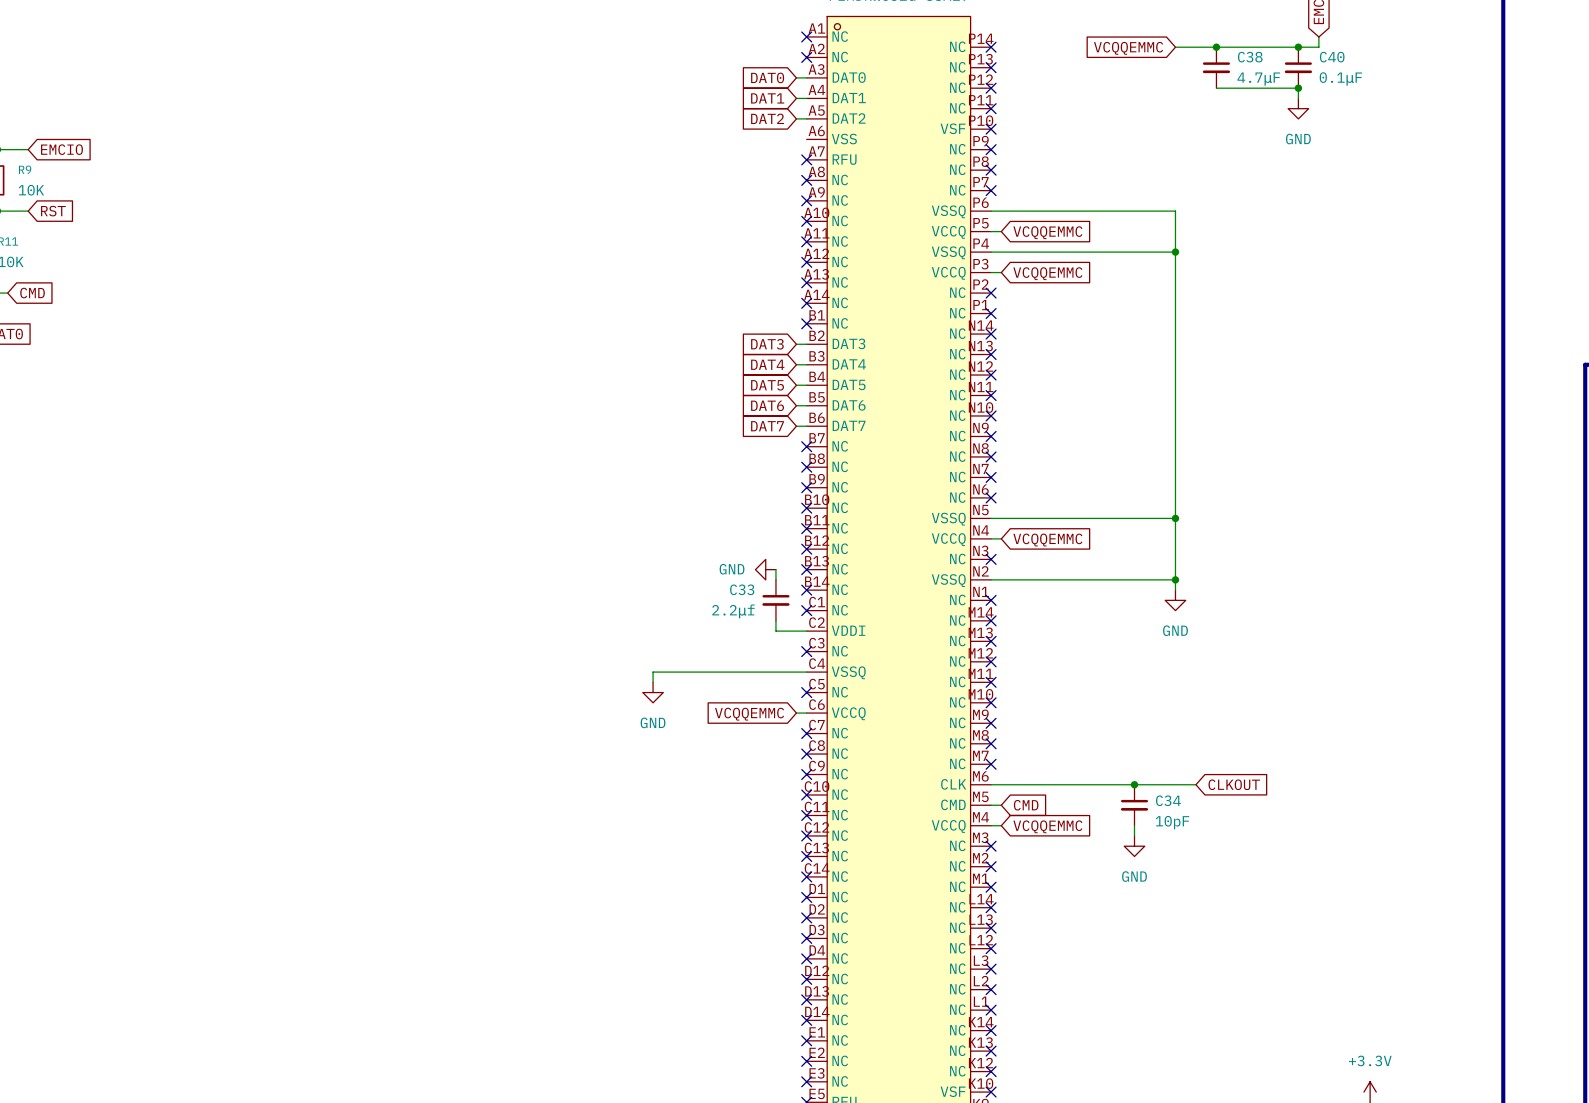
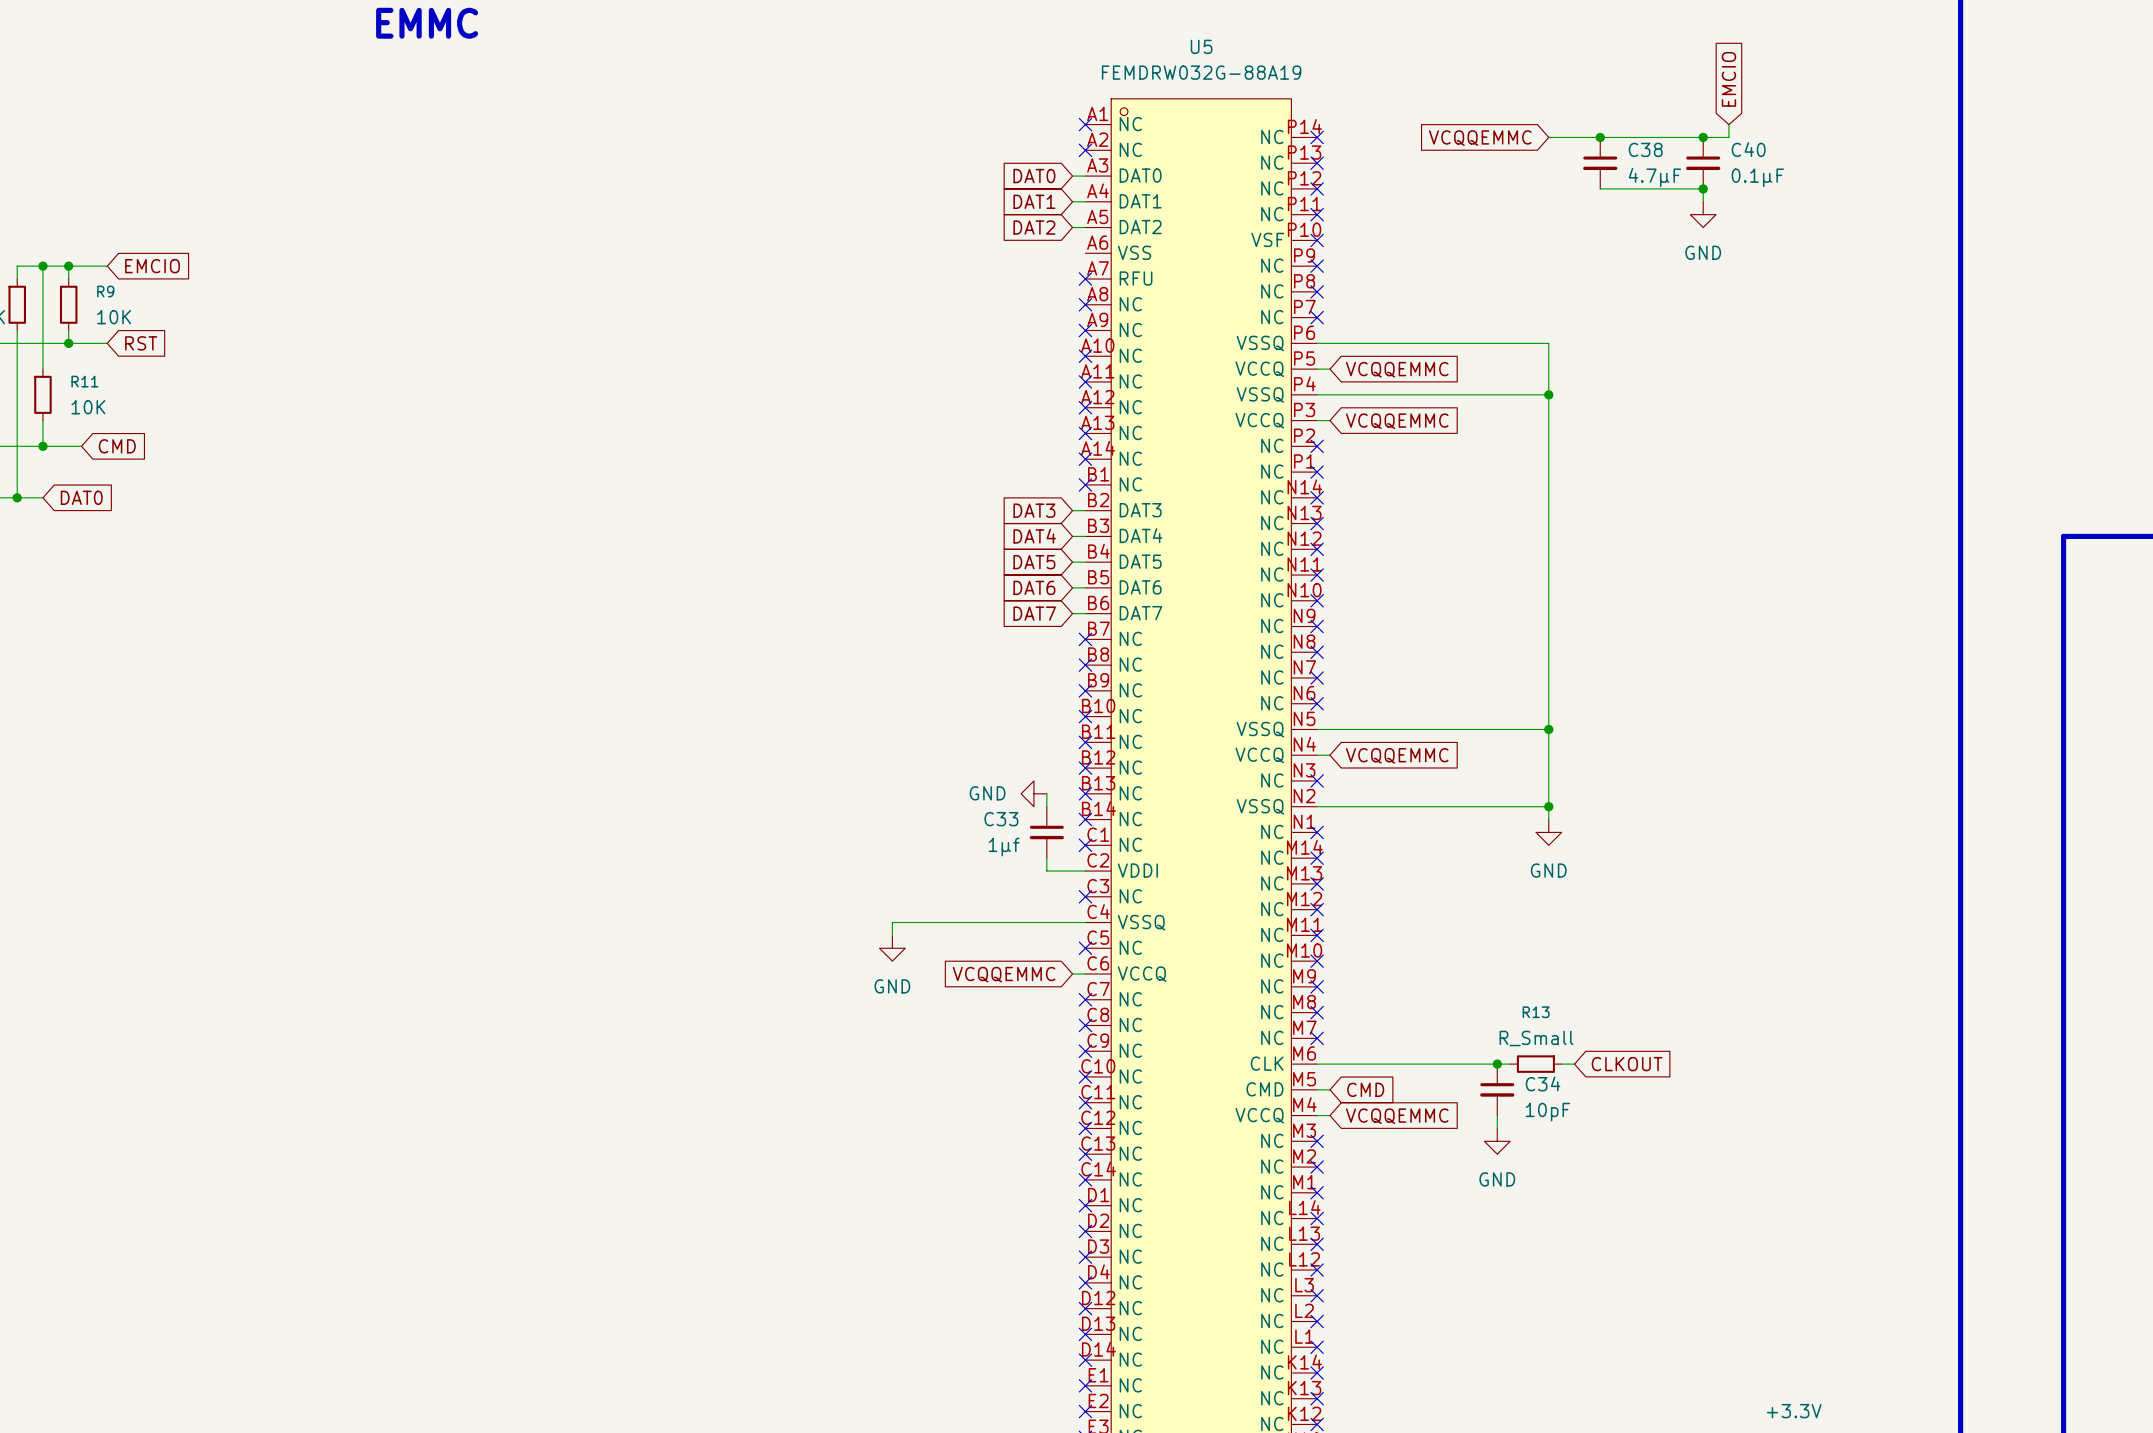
C33 value: 2.2μf (733, 611) -> 1μf (1004, 847)
wire: (1144, 784) (1185, 784) -> none
R13: none -> R_Small (1535, 1064)

